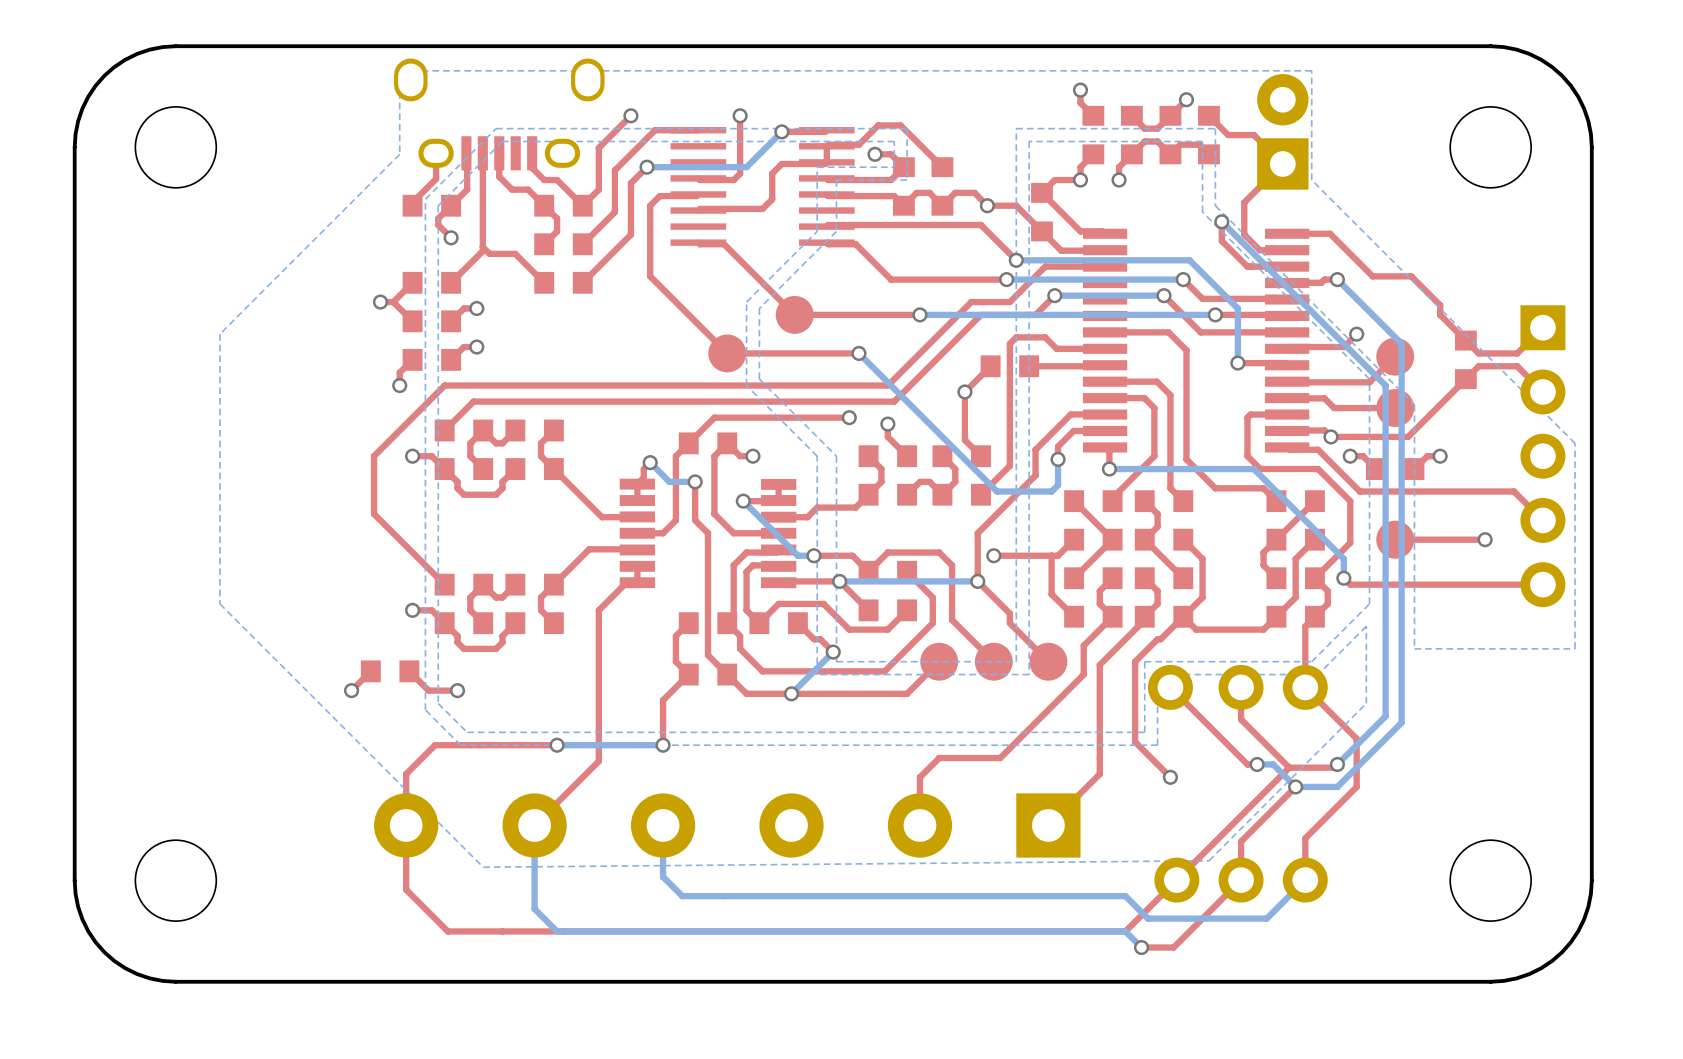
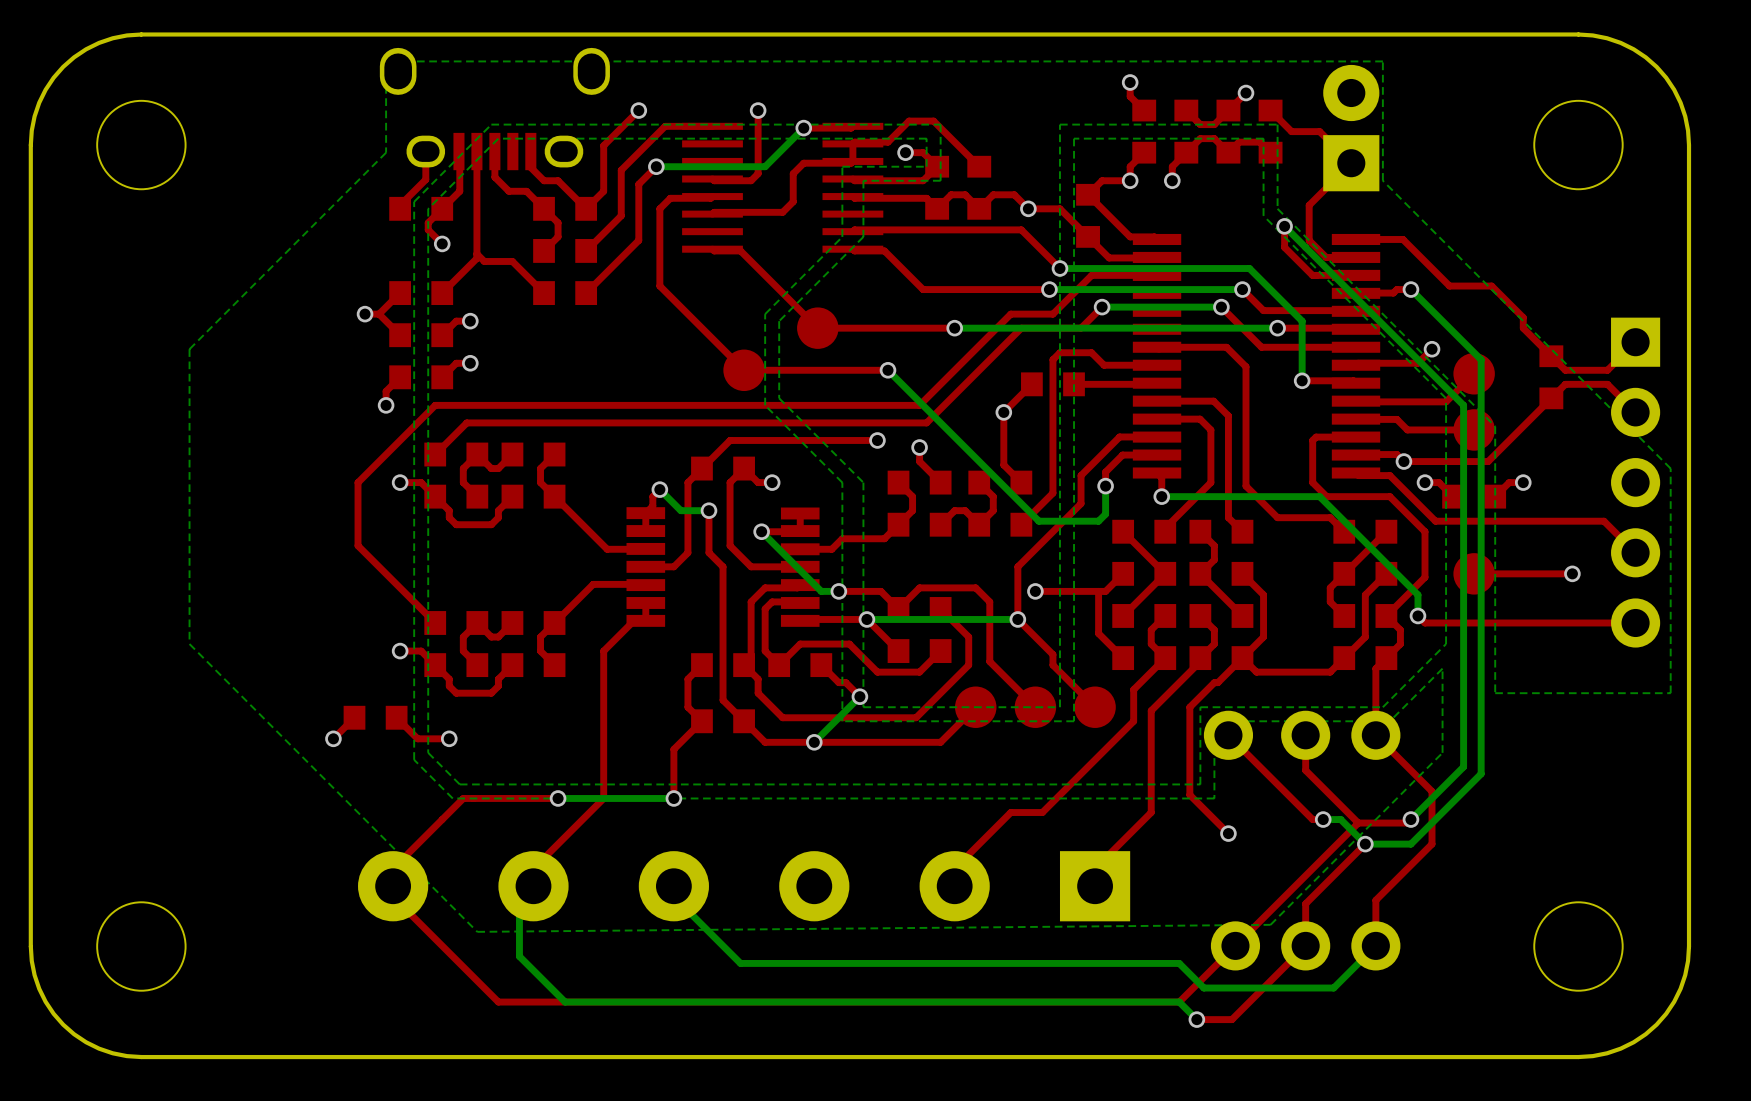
top track: (470, 745) (435, 745) (406, 774) (406, 889) (447, 931) (502, 931) -> (463, 798) (379, 882) (498, 1002)
top track: (598, 745) (598, 761) (534, 825) -> (603, 798) (519, 882)
top track: (971, 758) (939, 758) (919, 777) (919, 825) -> (1010, 812) (940, 882)
top track: (1099, 758) (1099, 774) (1048, 825) -> (1151, 812) (1081, 882)
bottom track: (534, 825) (534, 908) (557, 931) (563, 931) -> (519, 882) (519, 956) (565, 1002)
bottom track: (663, 825) (663, 876) (682, 896) (724, 896) -> (659, 882) (740, 963)

